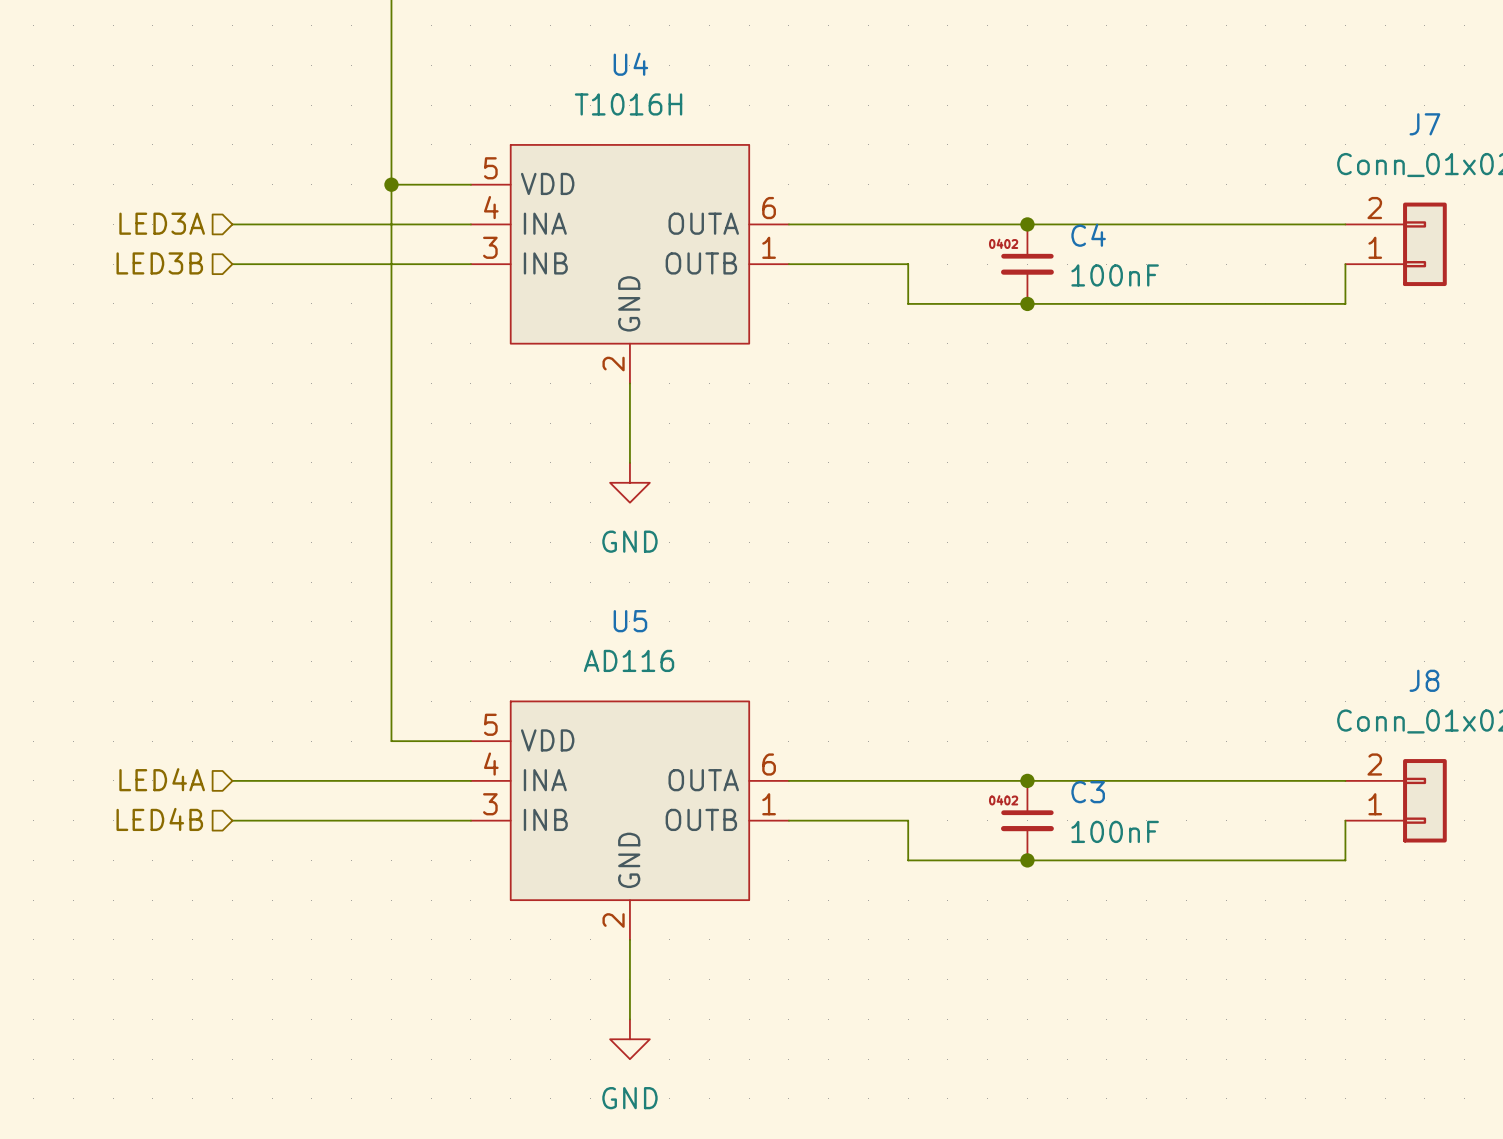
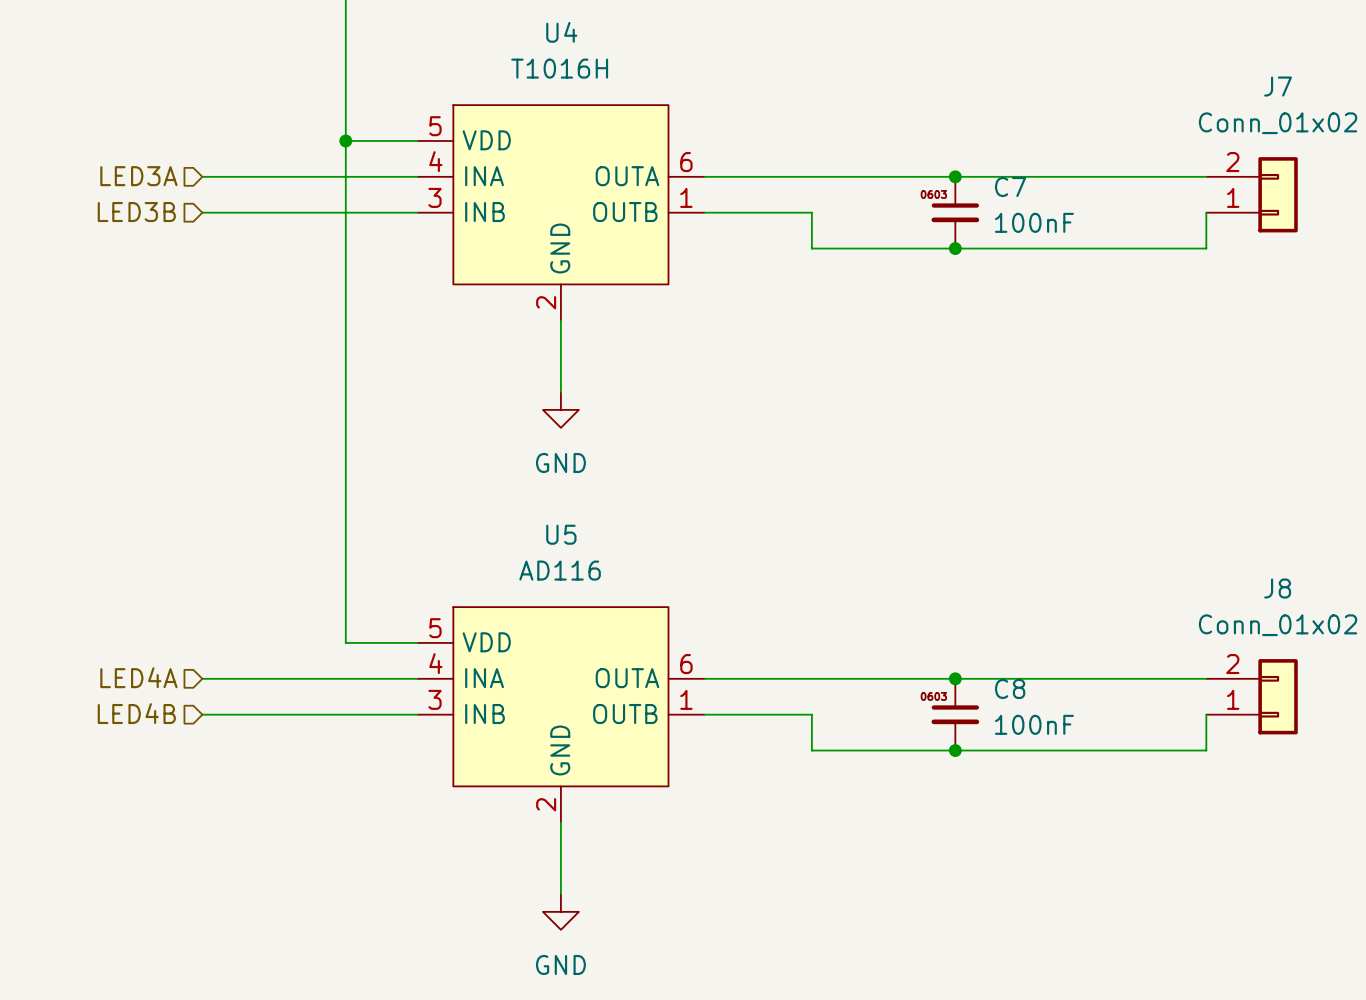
junction position: (1027, 224) -> (955, 176)
C4: 100nF (1027, 264) -> none
C7: none -> 100nF (955, 212)
junction position: (1027, 303) -> (955, 248)
junction position: (1027, 780) -> (955, 678)
C3: 100nF (1027, 820) -> none
C8: none -> 100nF (955, 714)
junction position: (1027, 860) -> (955, 750)

